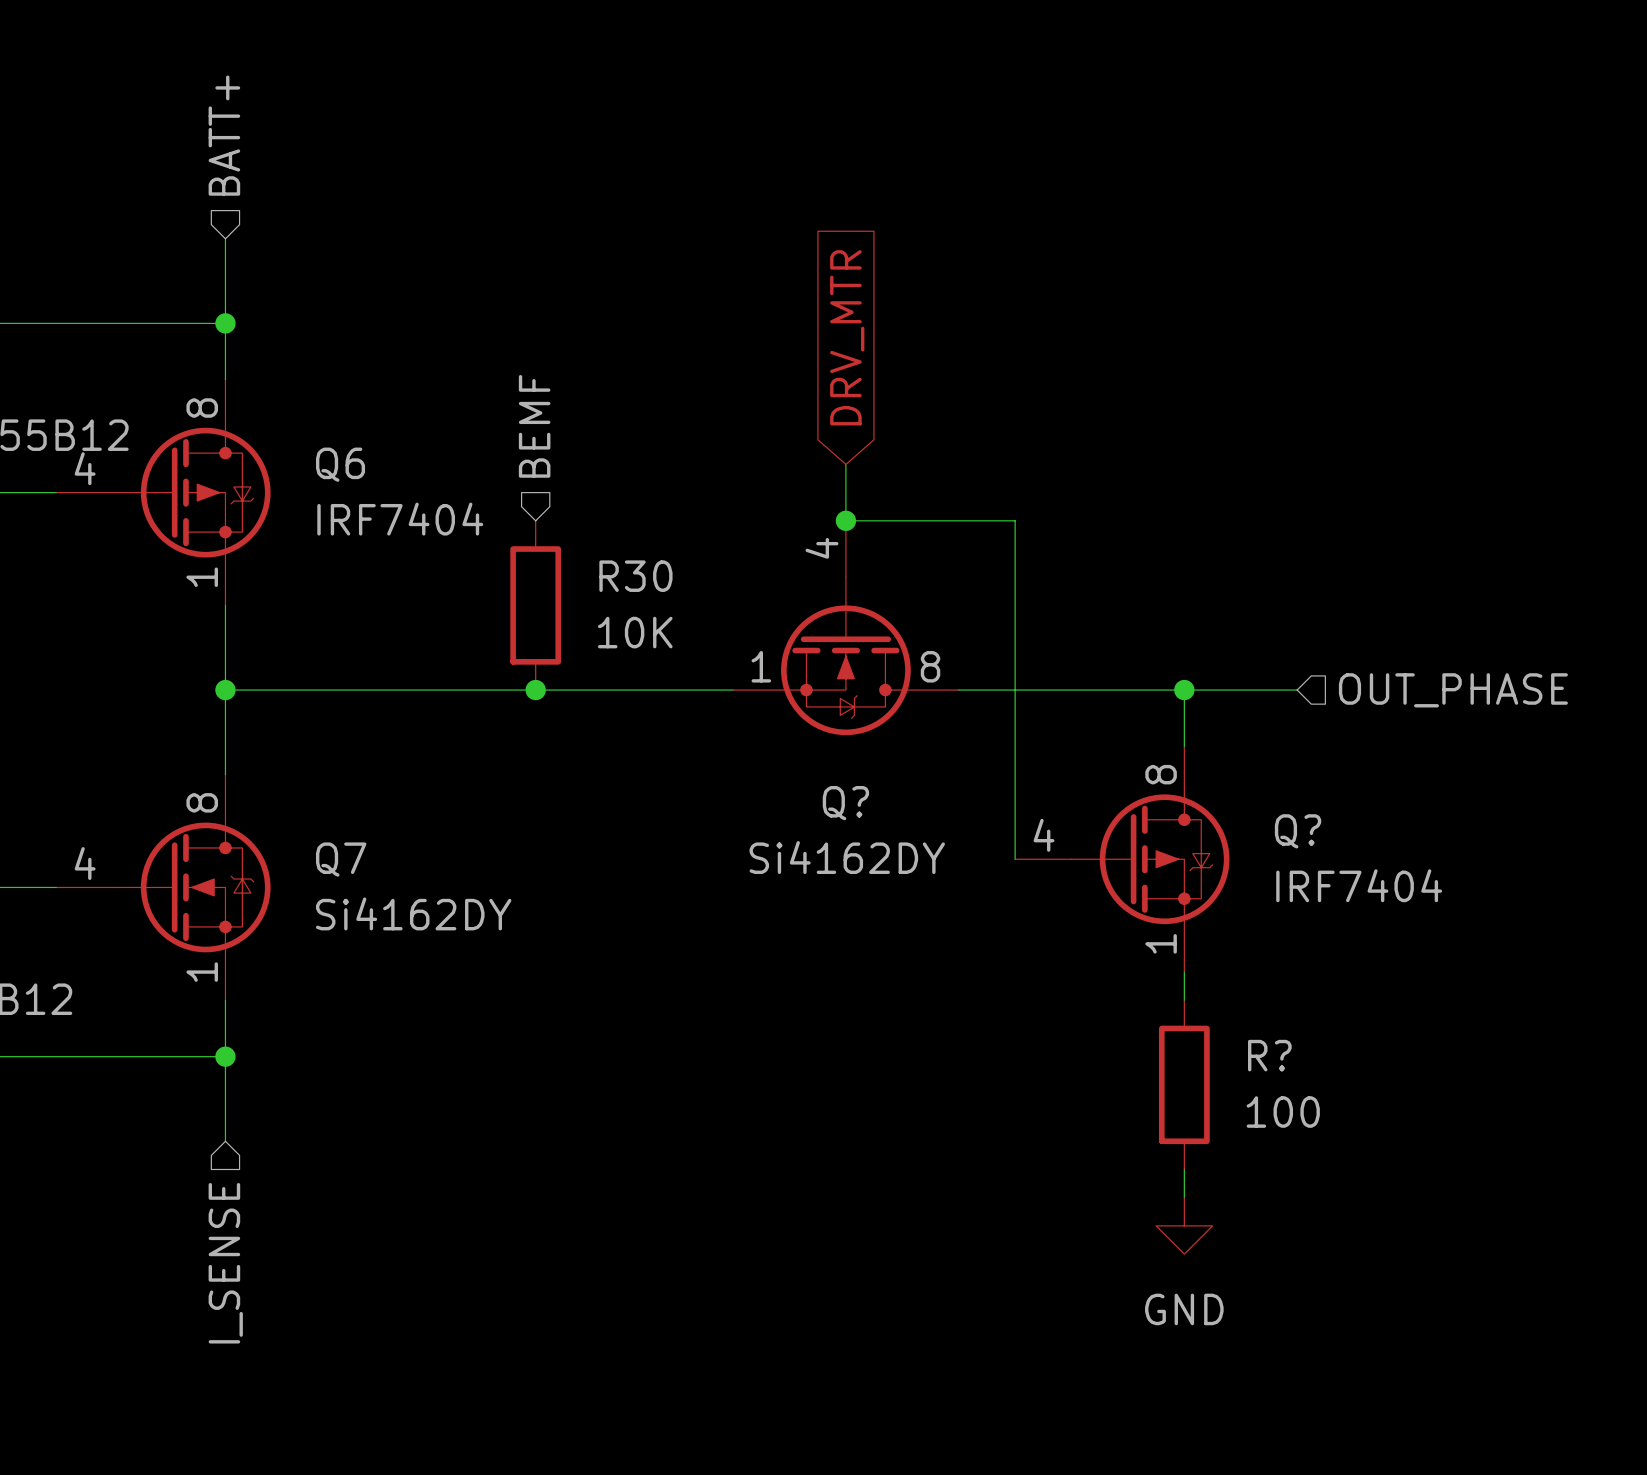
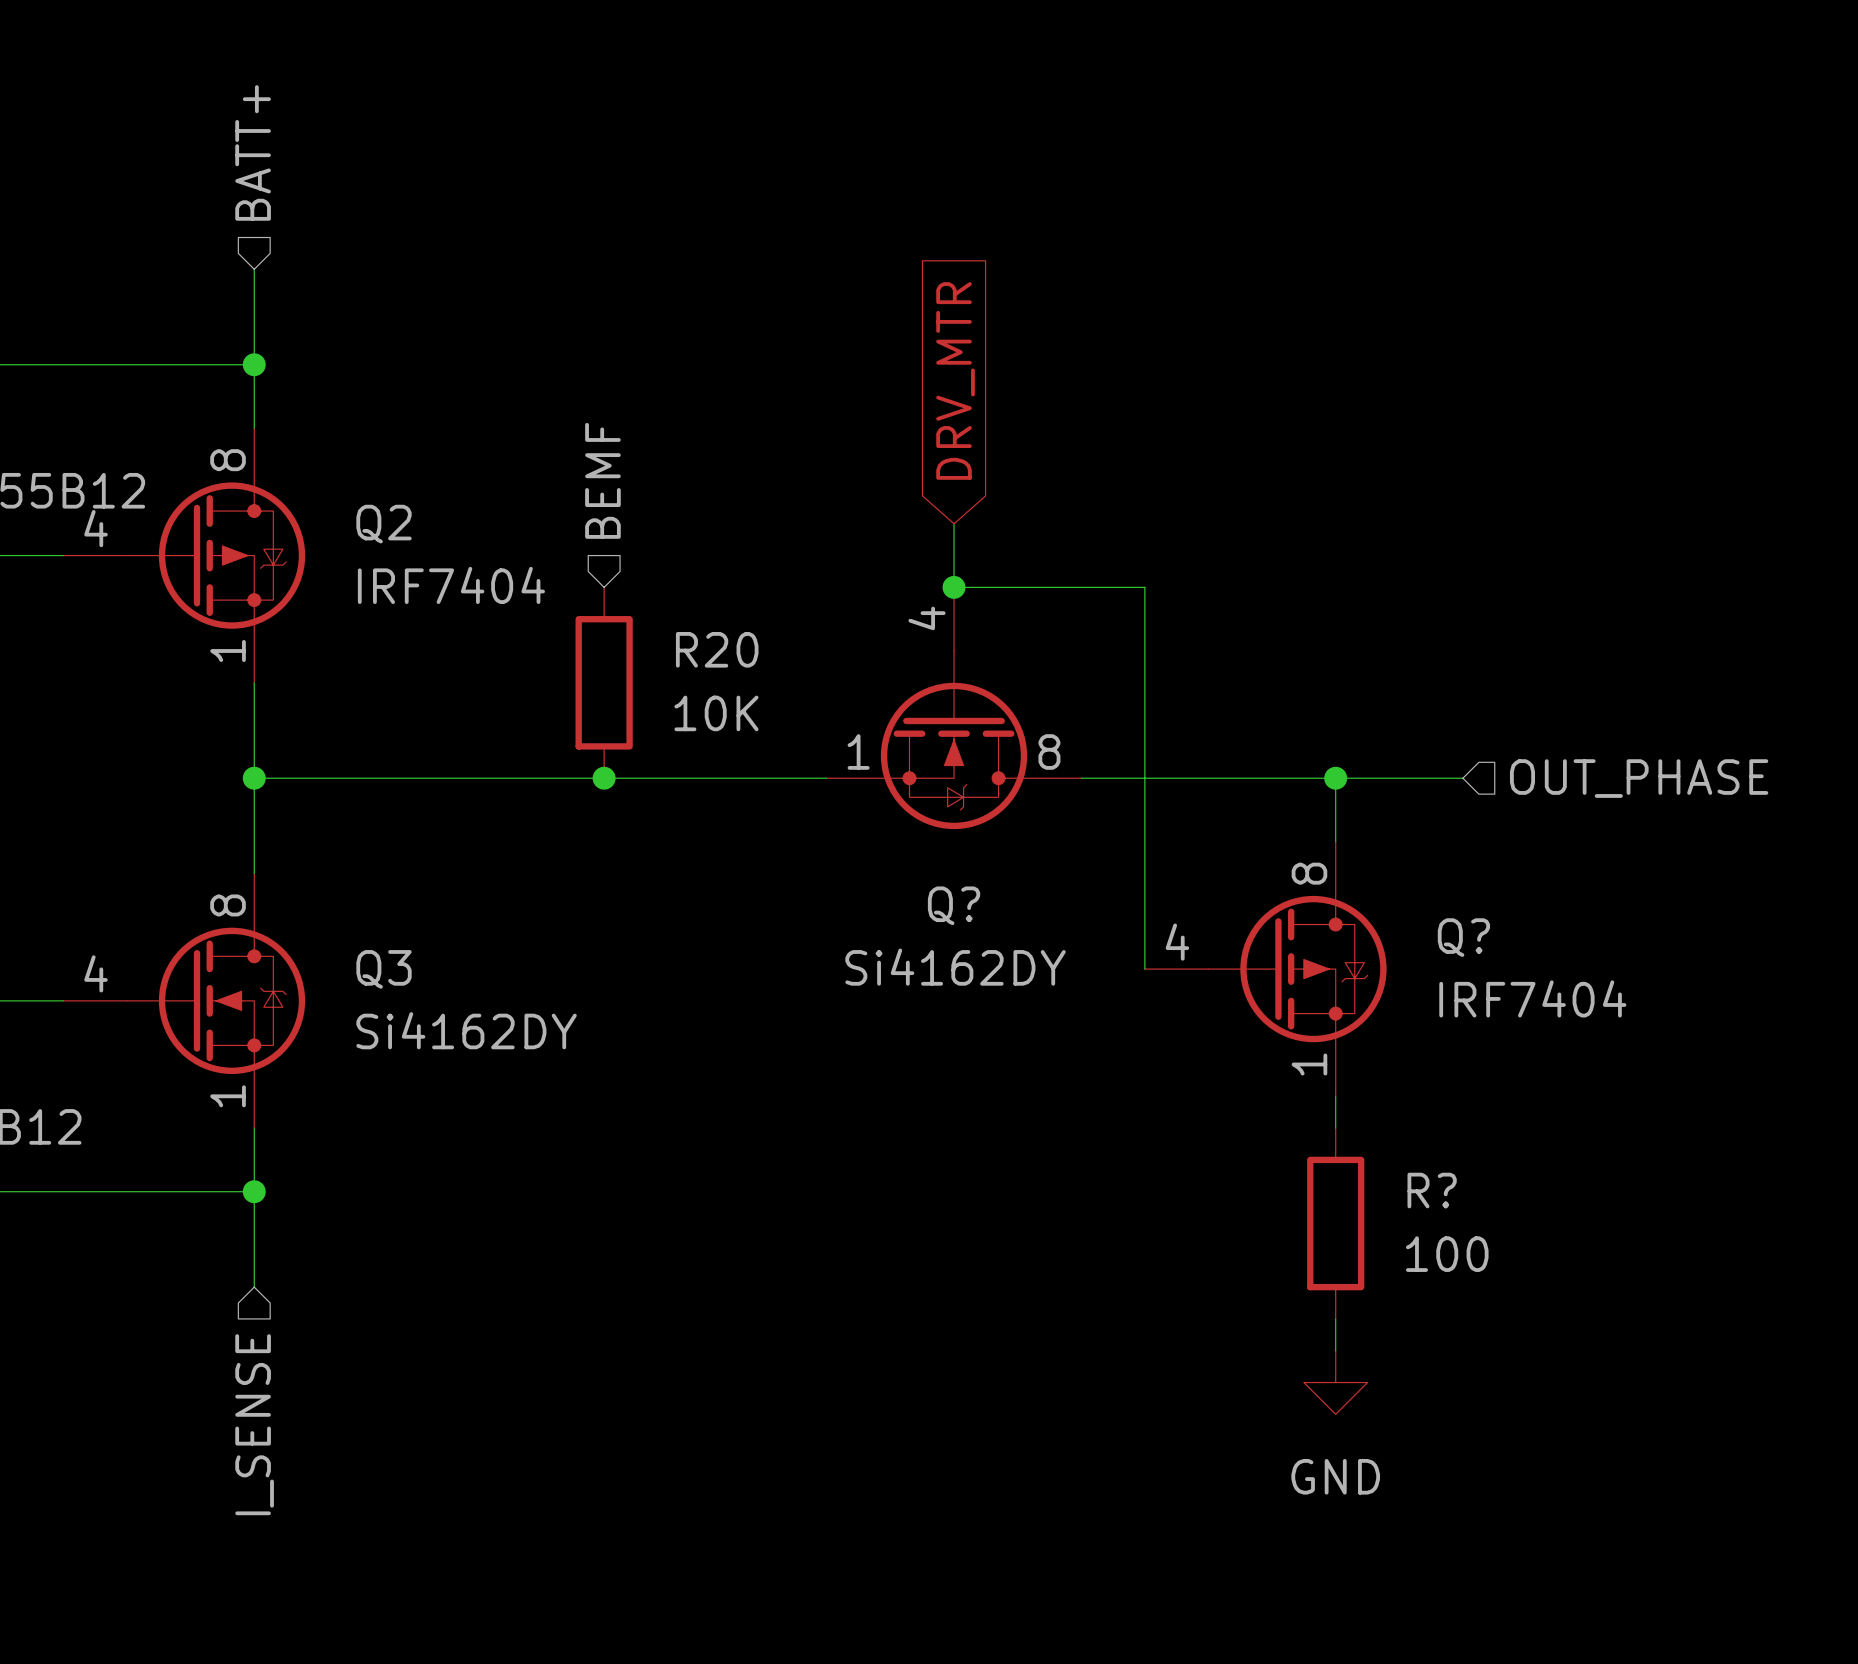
Q6 name: Q6 (340, 464) -> Q2 (384, 524)
R30 name: R30 (635, 576) -> R20 (717, 649)
Q7 name: Q7 (341, 859) -> Q3 (384, 969)

